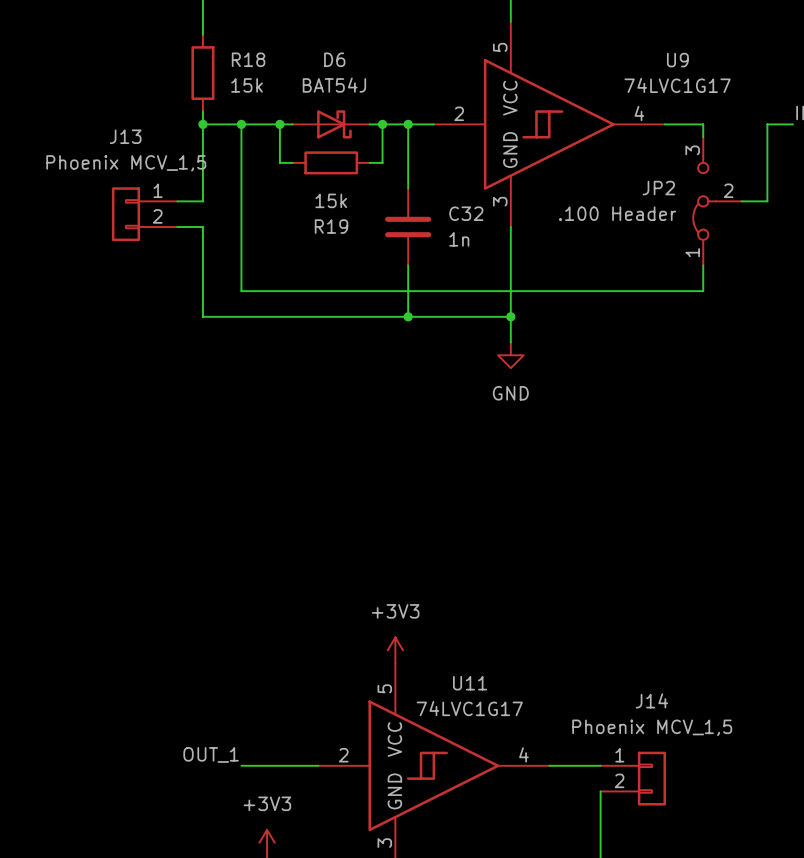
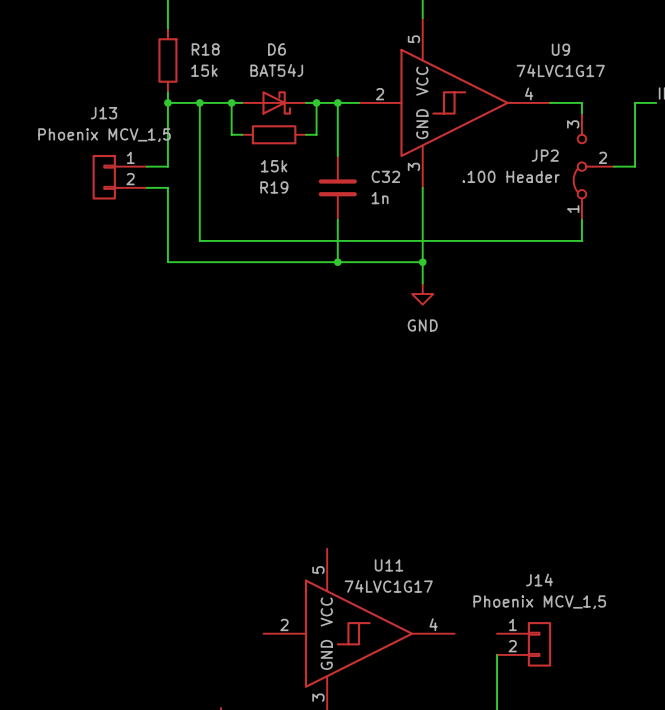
power symbol: +3V3 (395, 650) -> none
label: OUT_1 (211, 754) -> none
wire: (241, 765) (318, 765) -> none
wire: (549, 765) (600, 765) -> none
power symbol: +3V3 (267, 842) -> none

